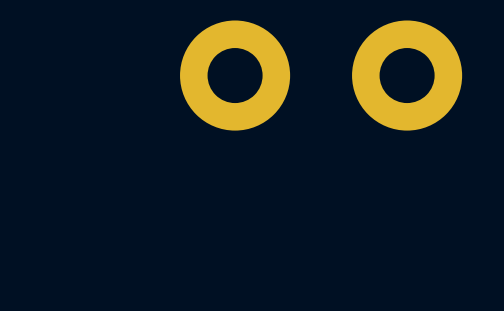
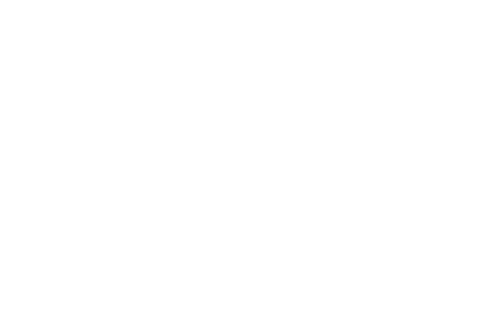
part: (321, 75) -> none

